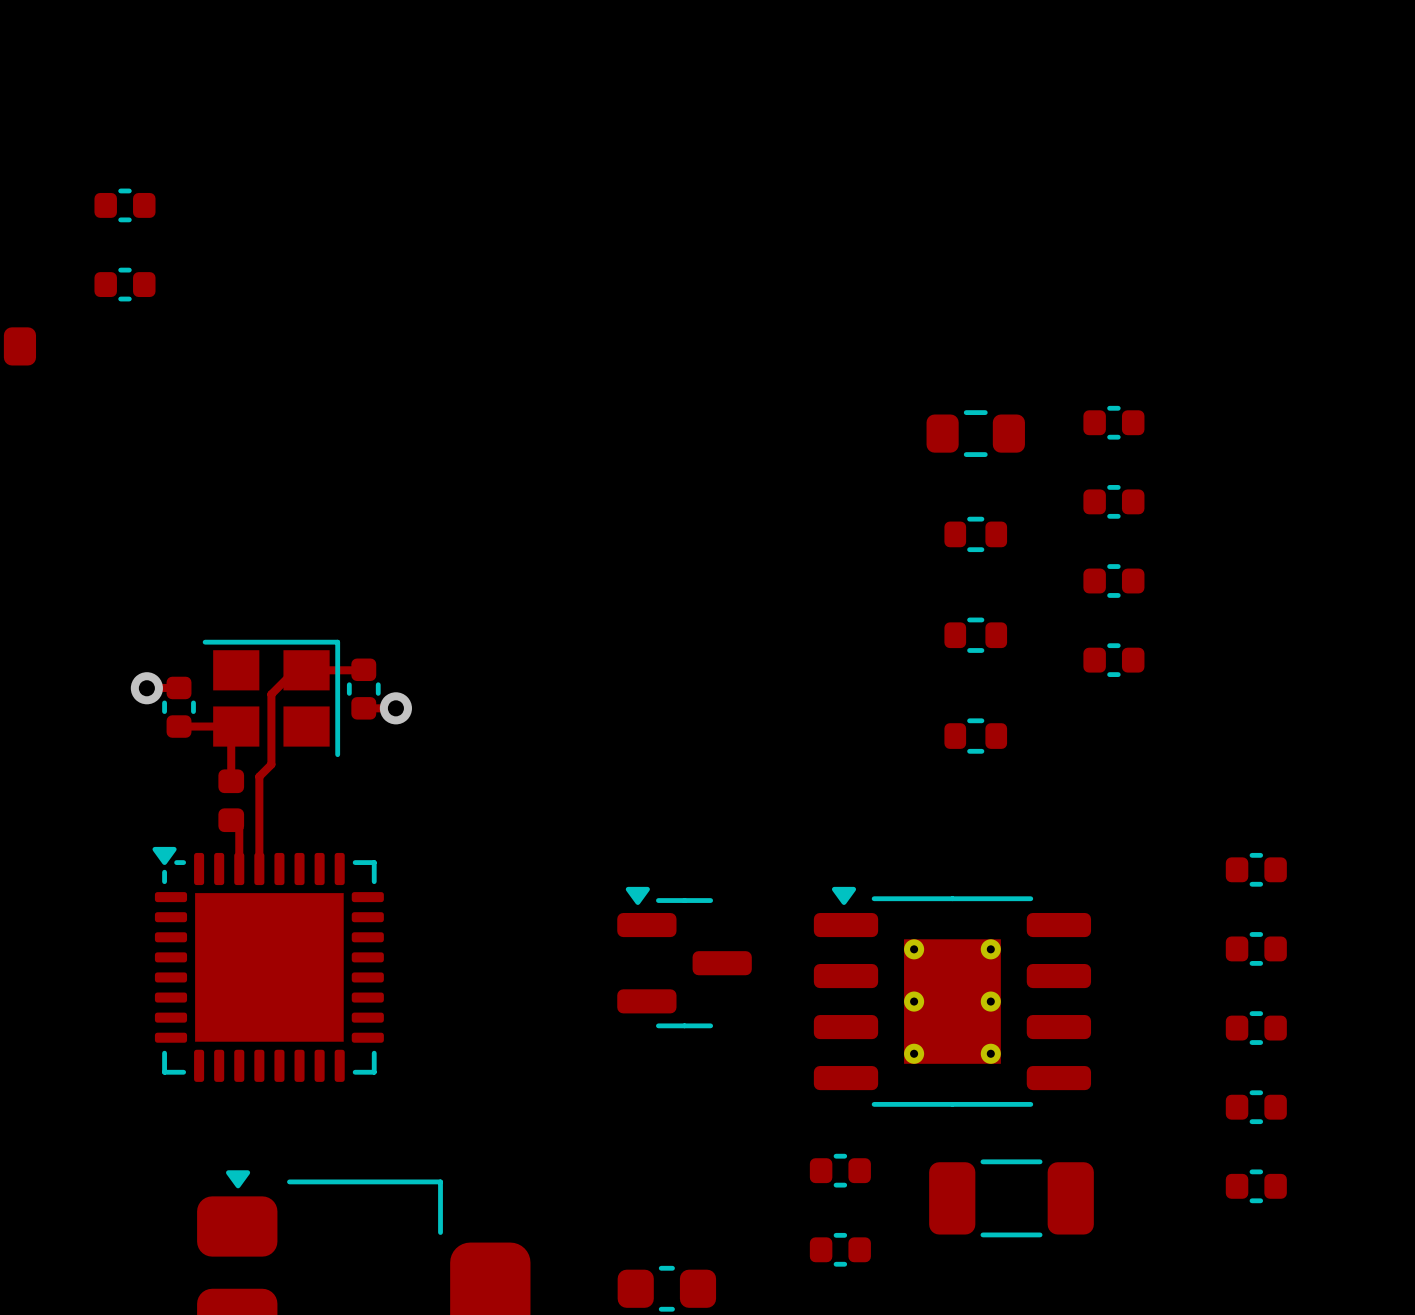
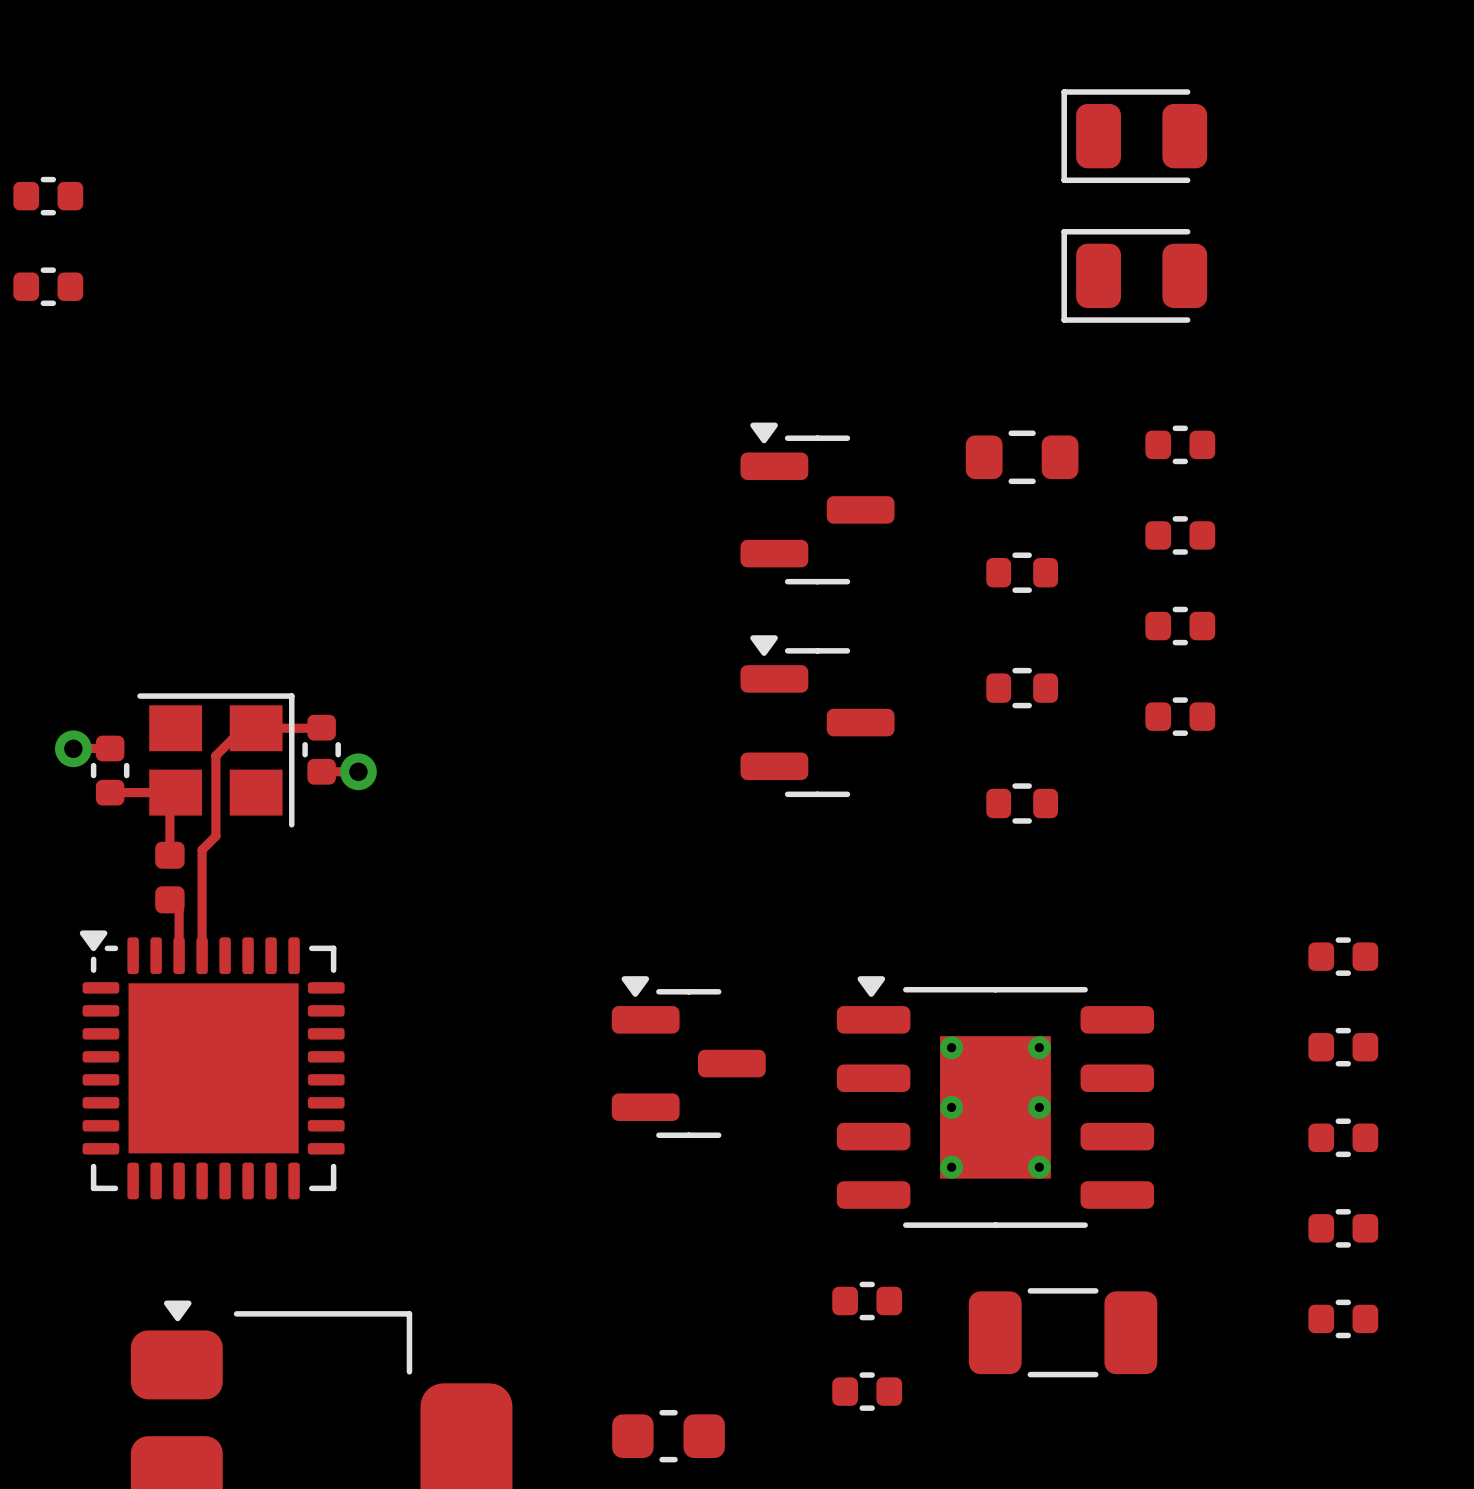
part: none -> (1134, 136)
part: none -> (1134, 275)
part: none -> (817, 503)
part: none -> (817, 716)

